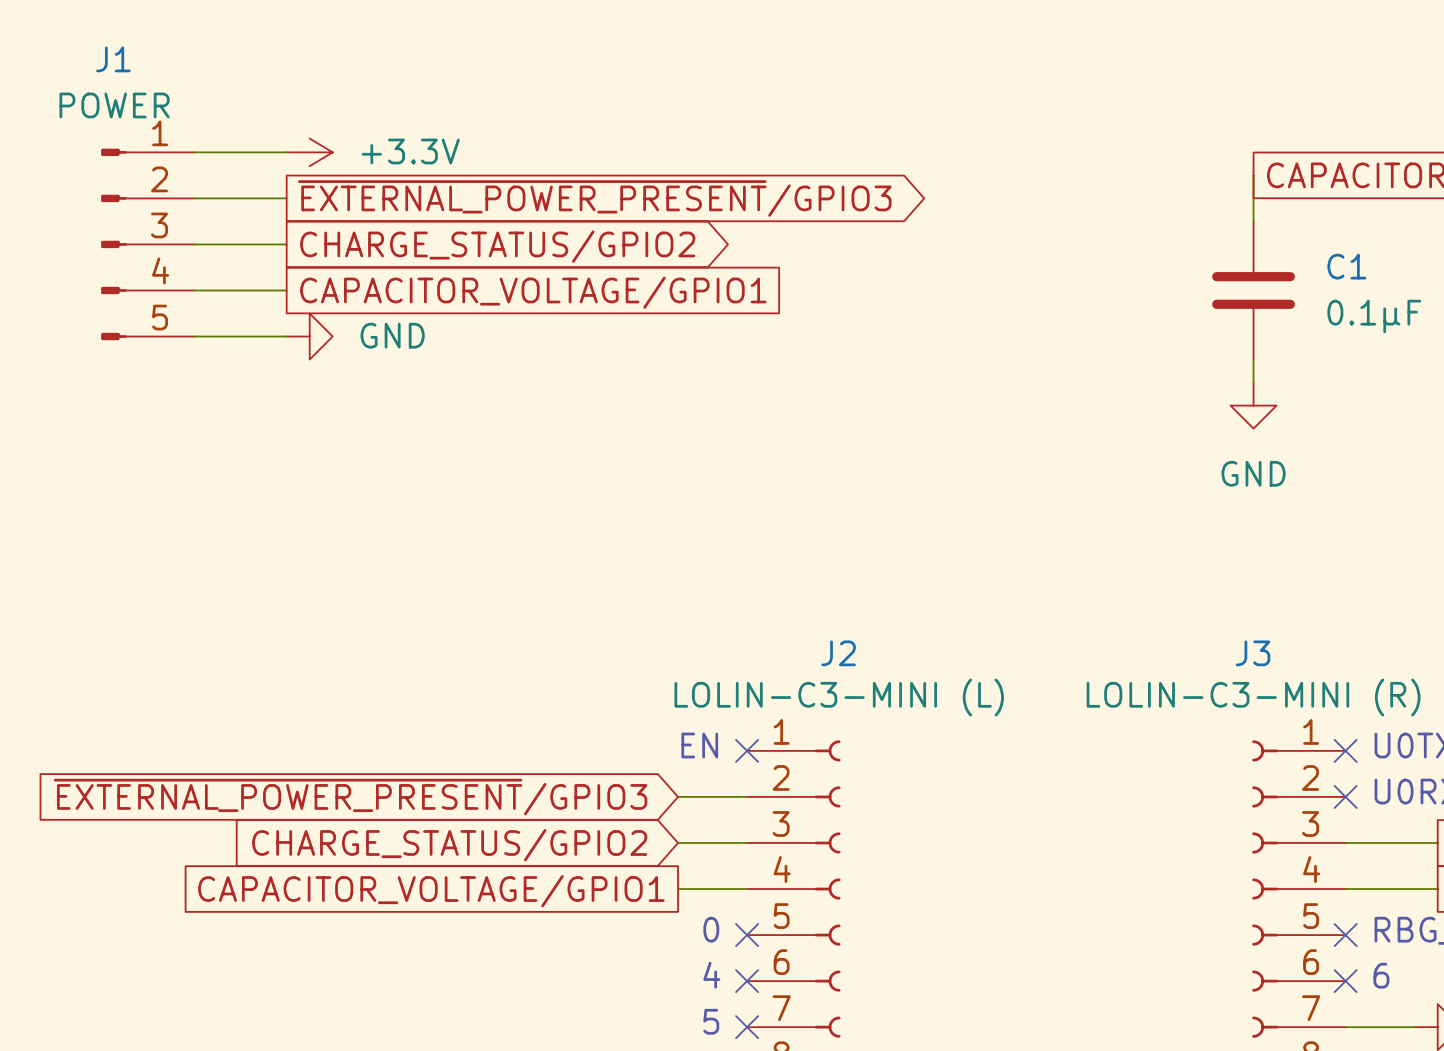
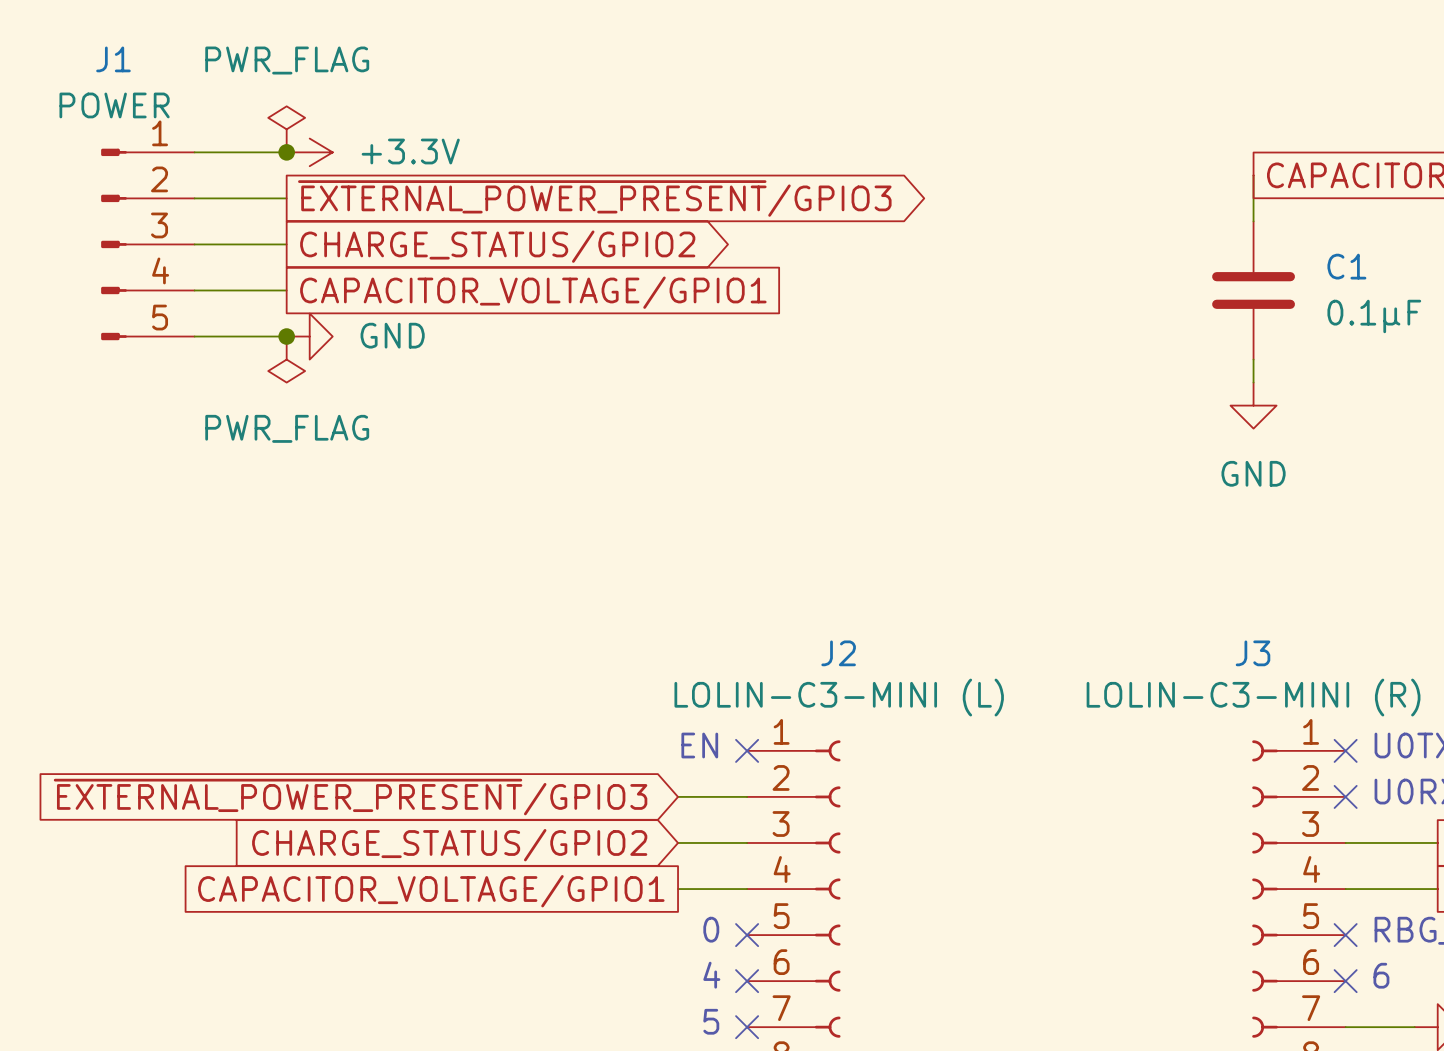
power symbol: none -> PWR_FLAG (286, 129)
junction: none -> (286, 152)
junction: none -> (286, 336)
power symbol: none -> PWR_FLAG (286, 359)

